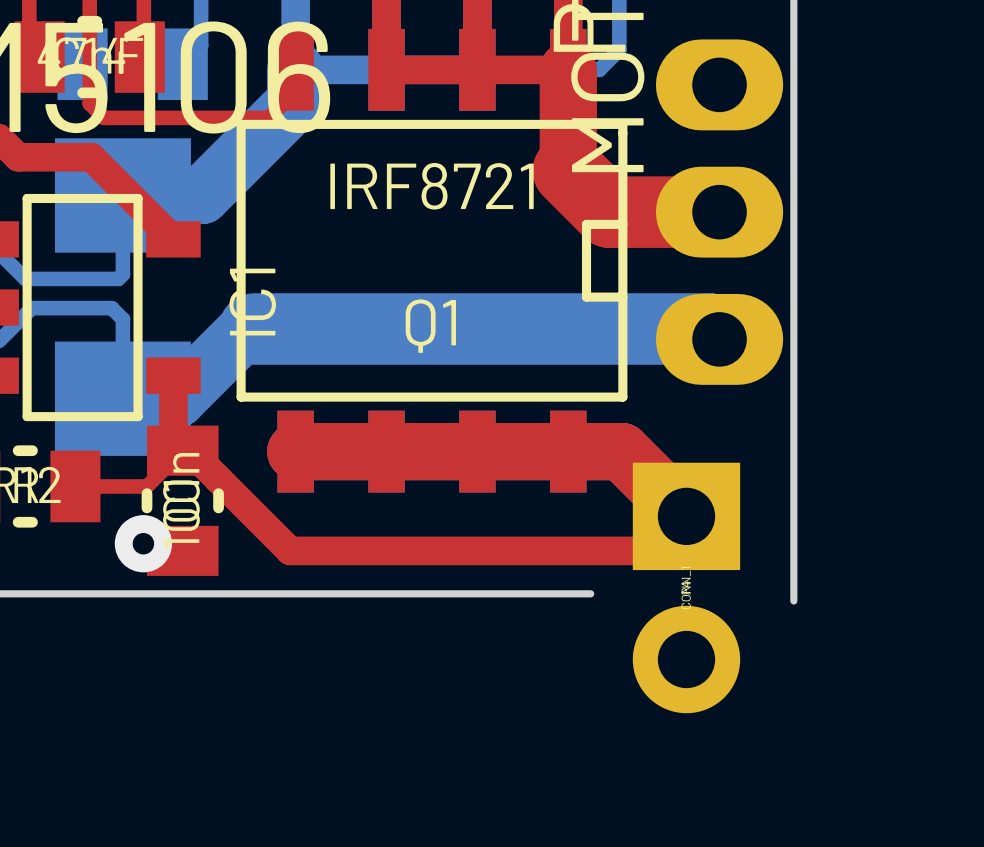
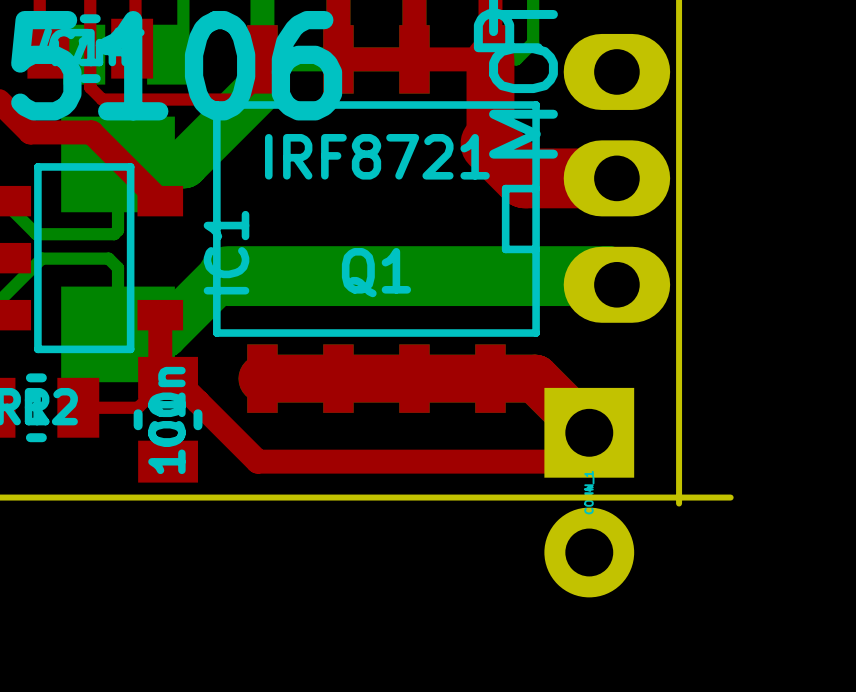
via: (143, 543) -> none
board edge: none -> (509, 497) (730, 497)

